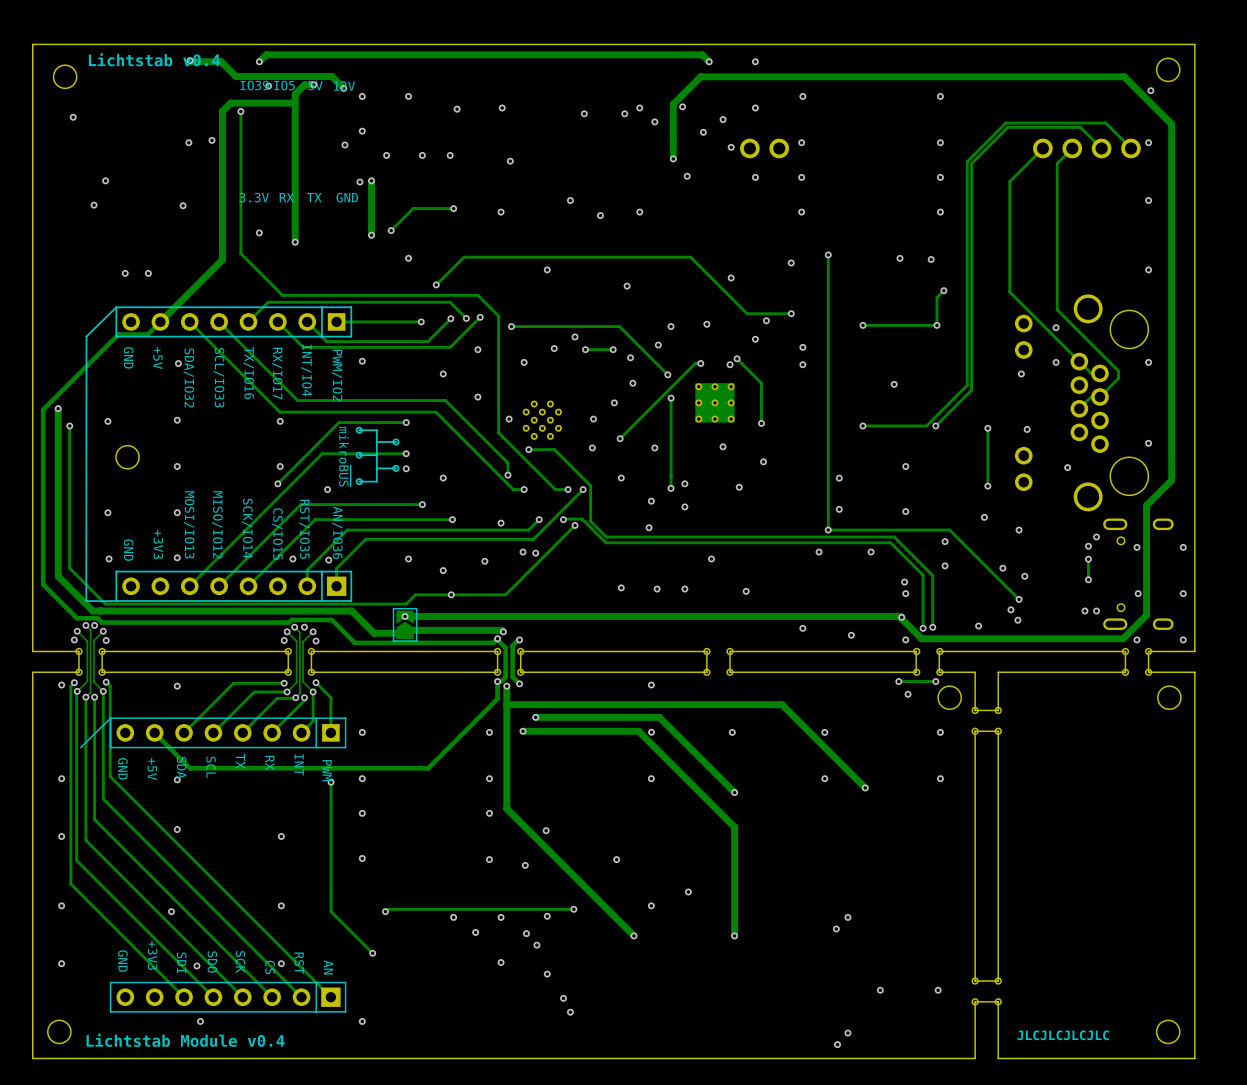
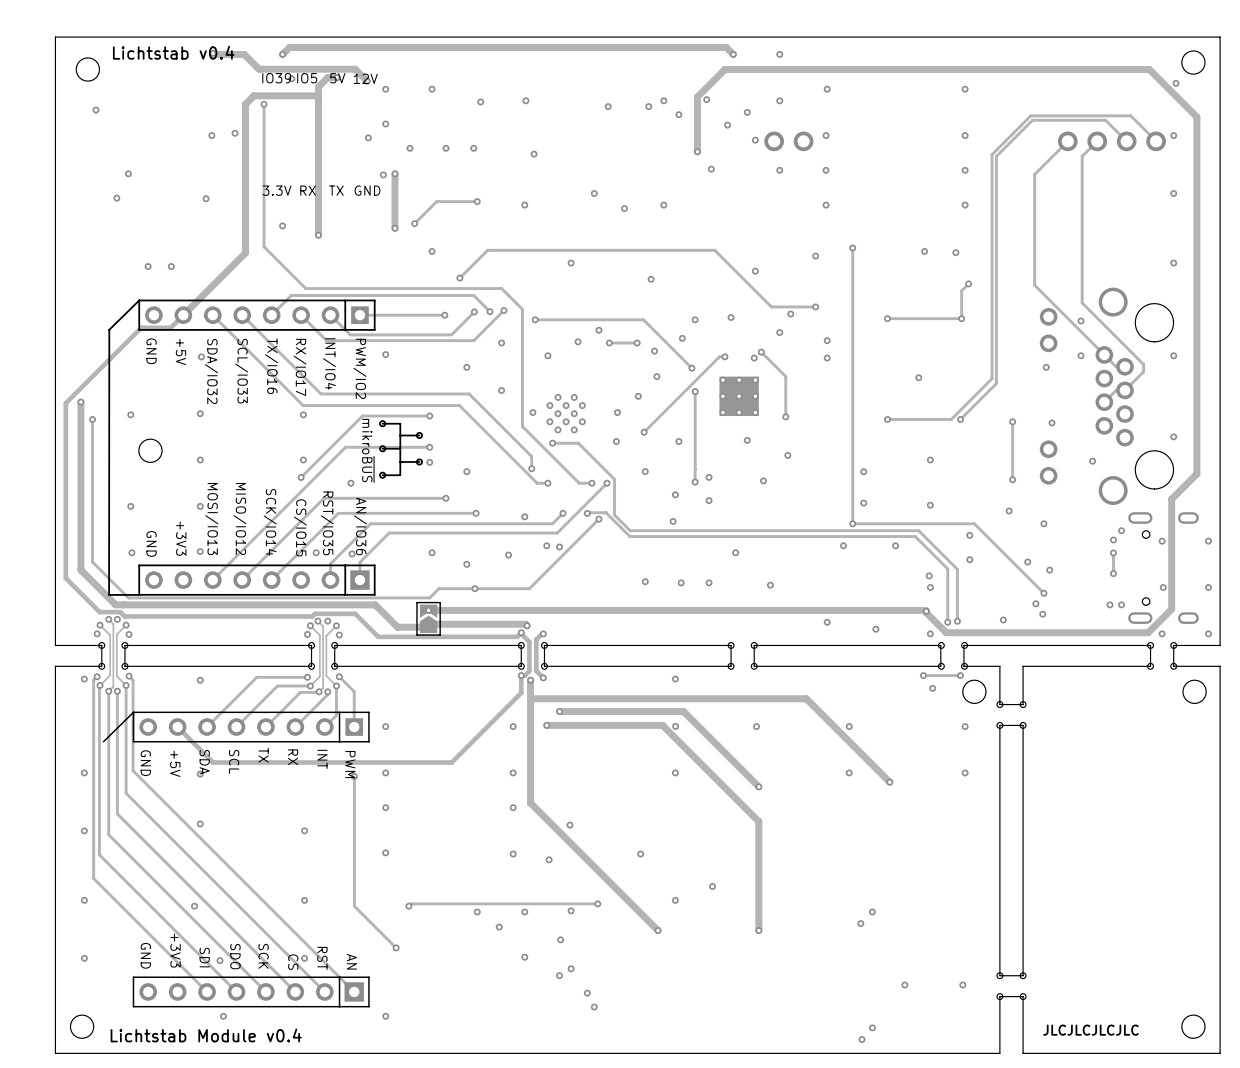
via position: (526, 933) -> (559, 975)

